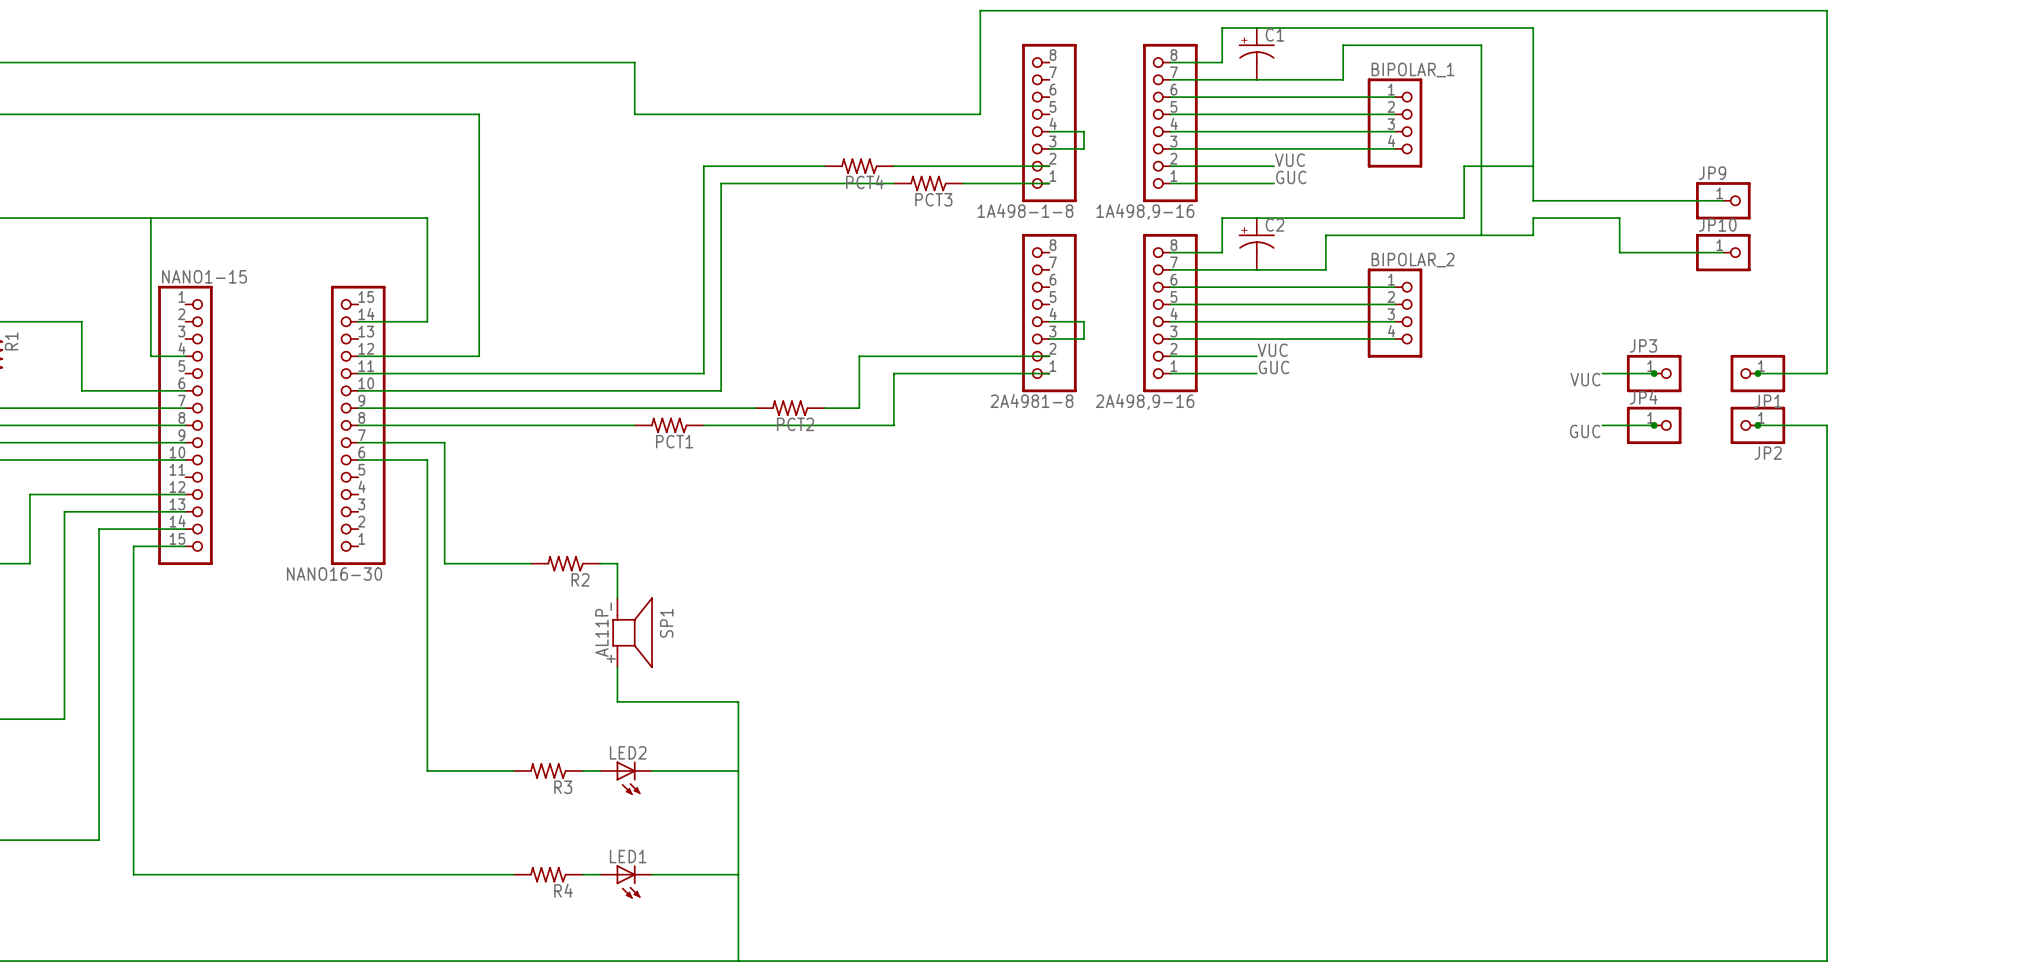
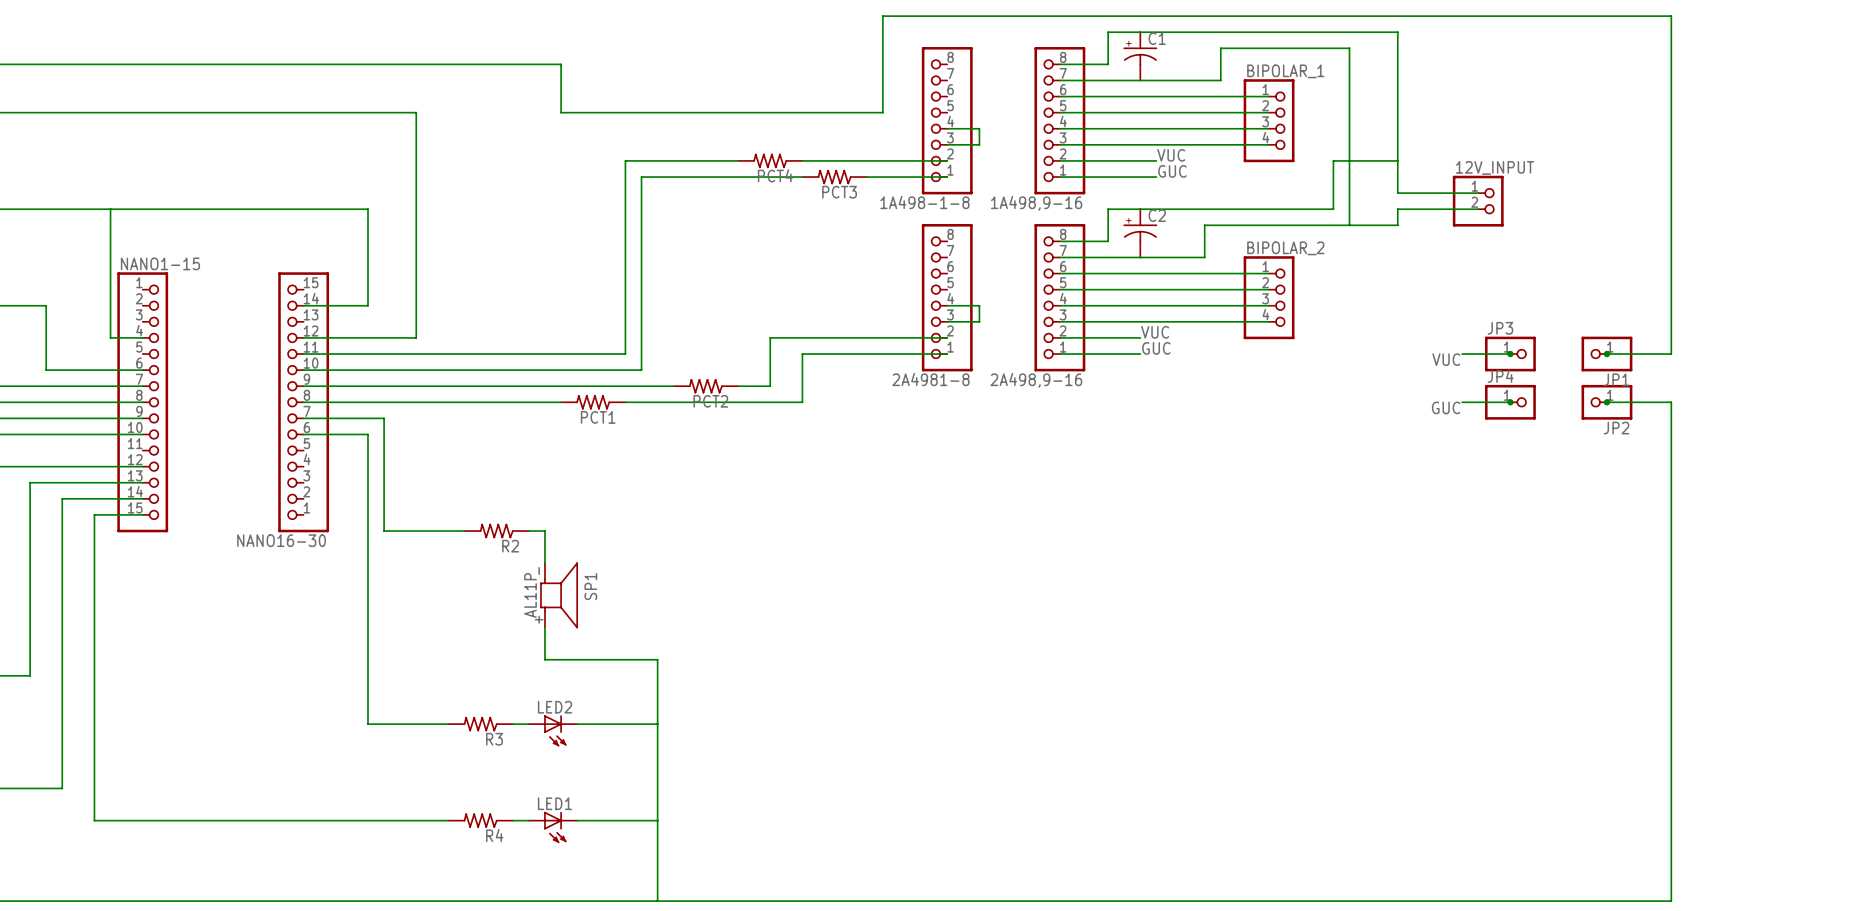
wire: (1619, 200) (1723, 200) -> none
JP9: (1723, 200) -> none
12V_INPUT: none -> (1478, 201)
wire: (1619, 218) (1619, 252) (1723, 252) -> none
JP10: (1723, 252) -> none

